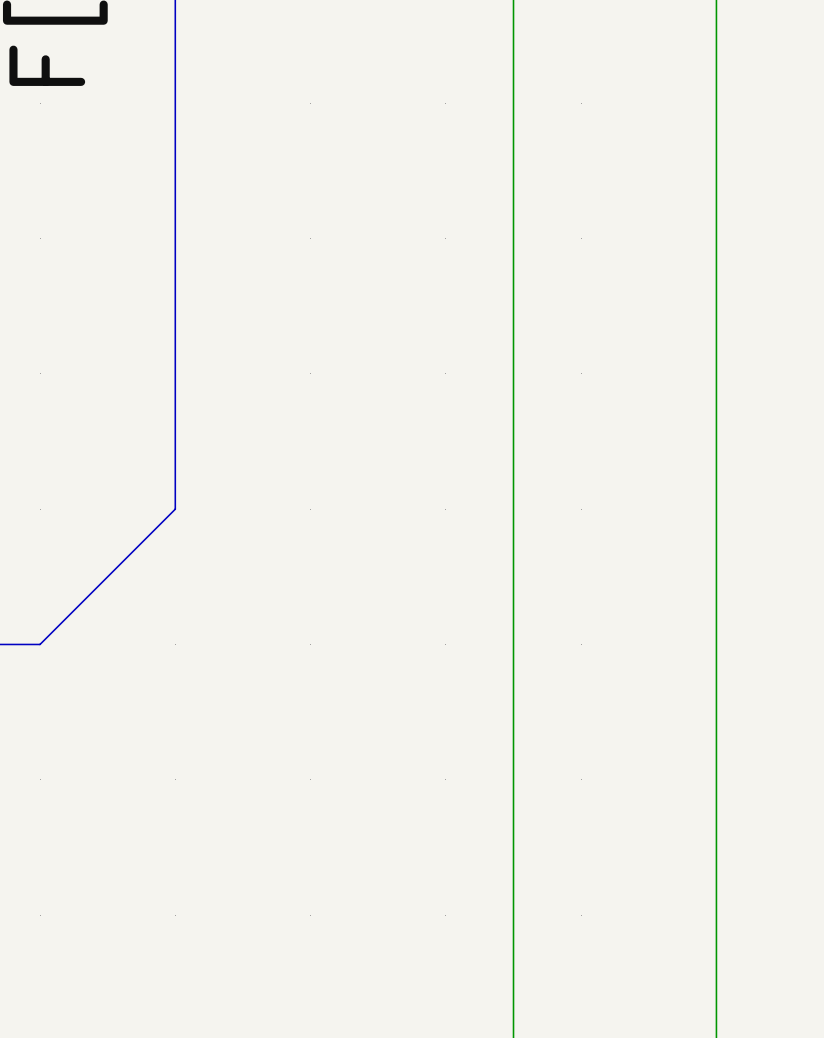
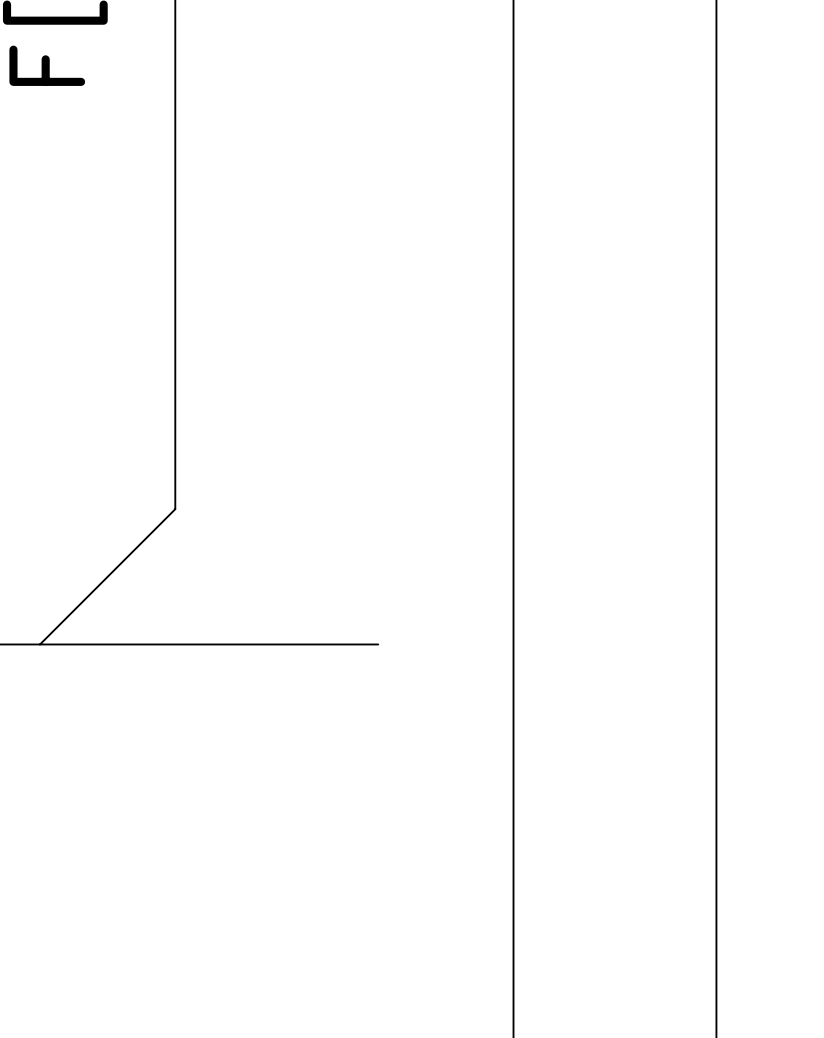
bus: none -> (40, 644) (378, 644)

